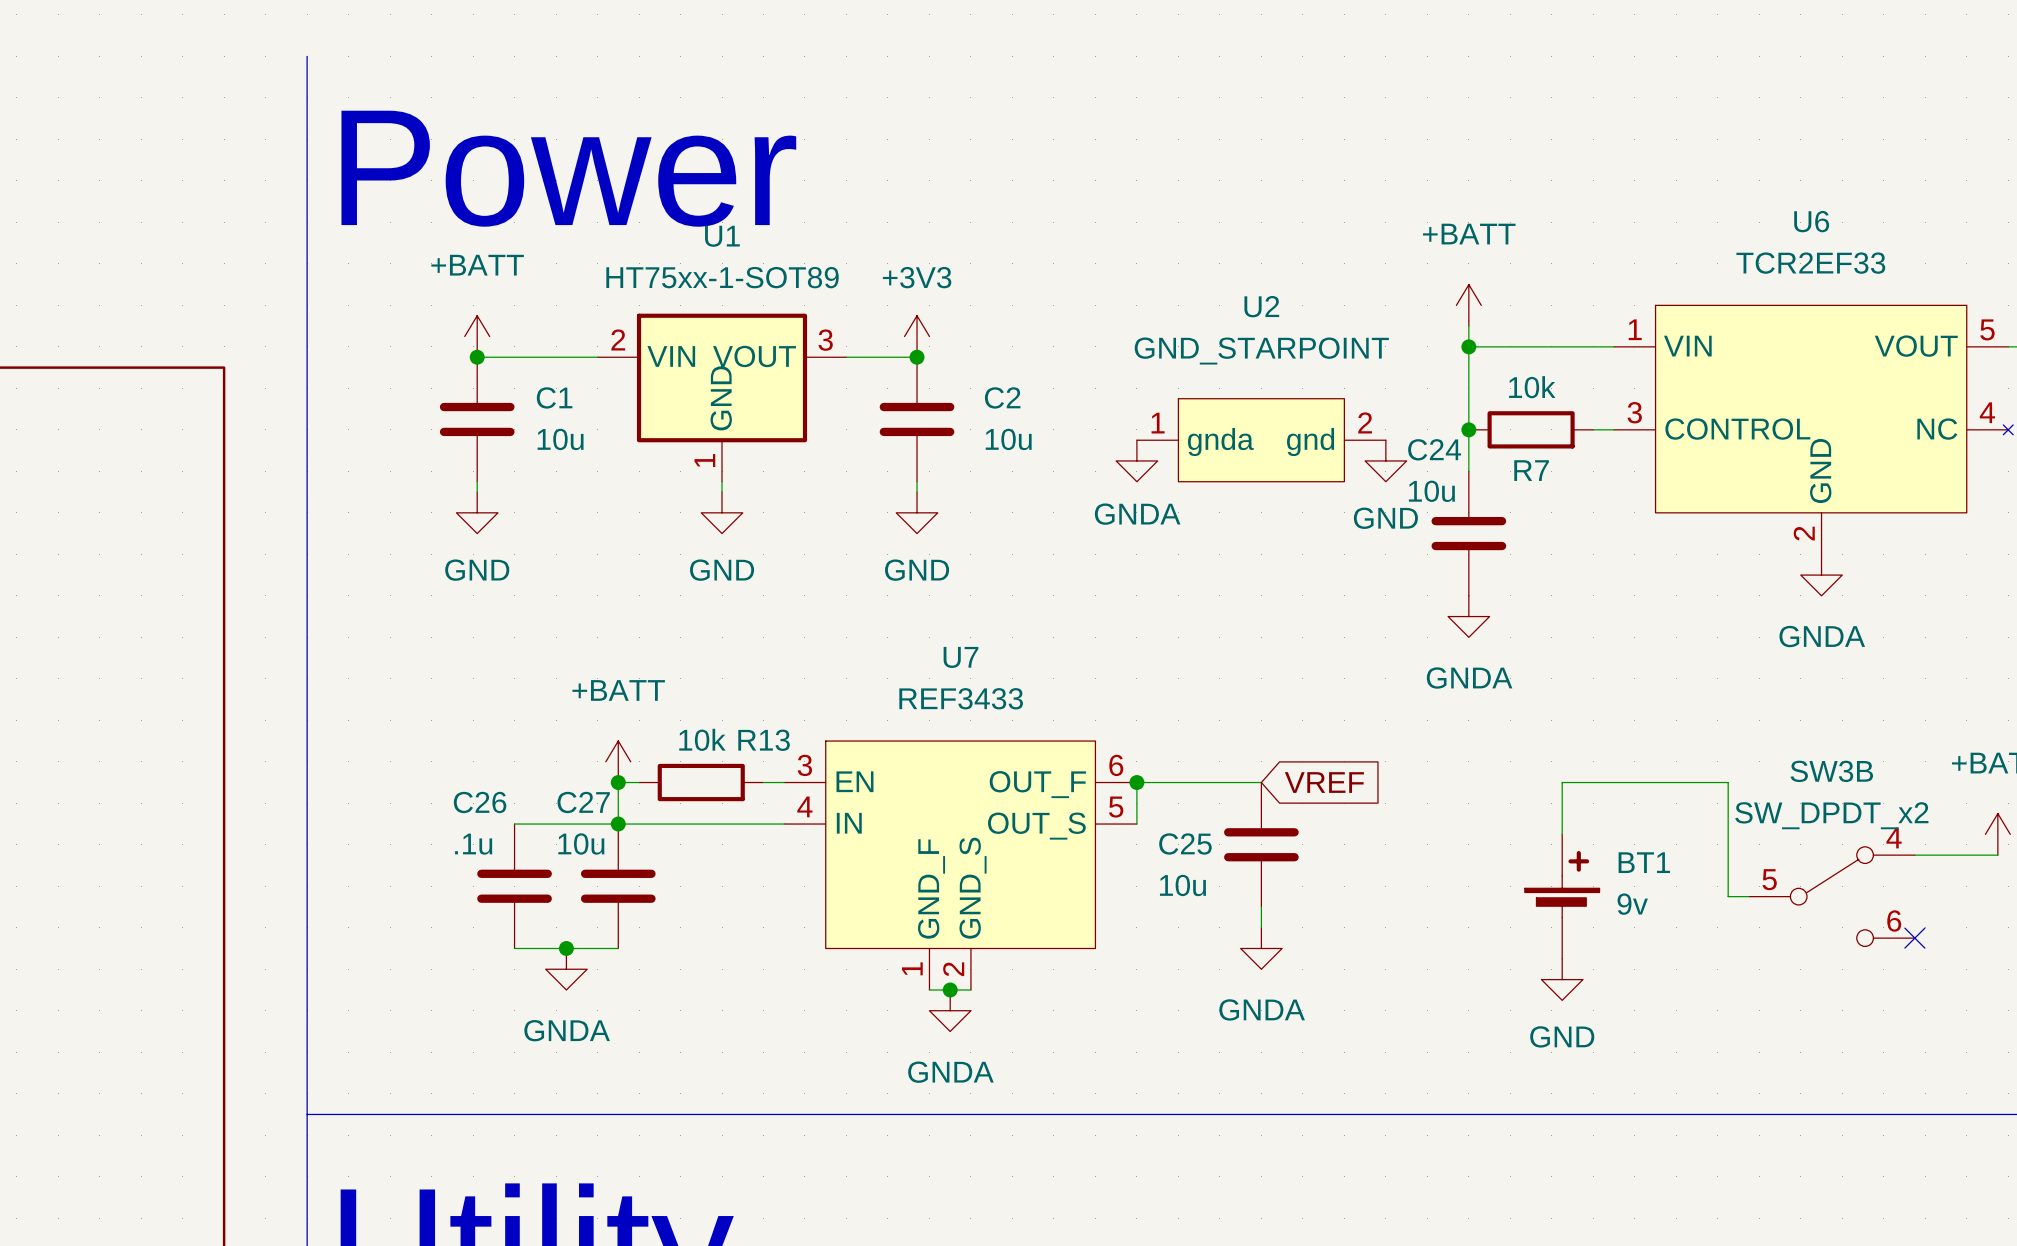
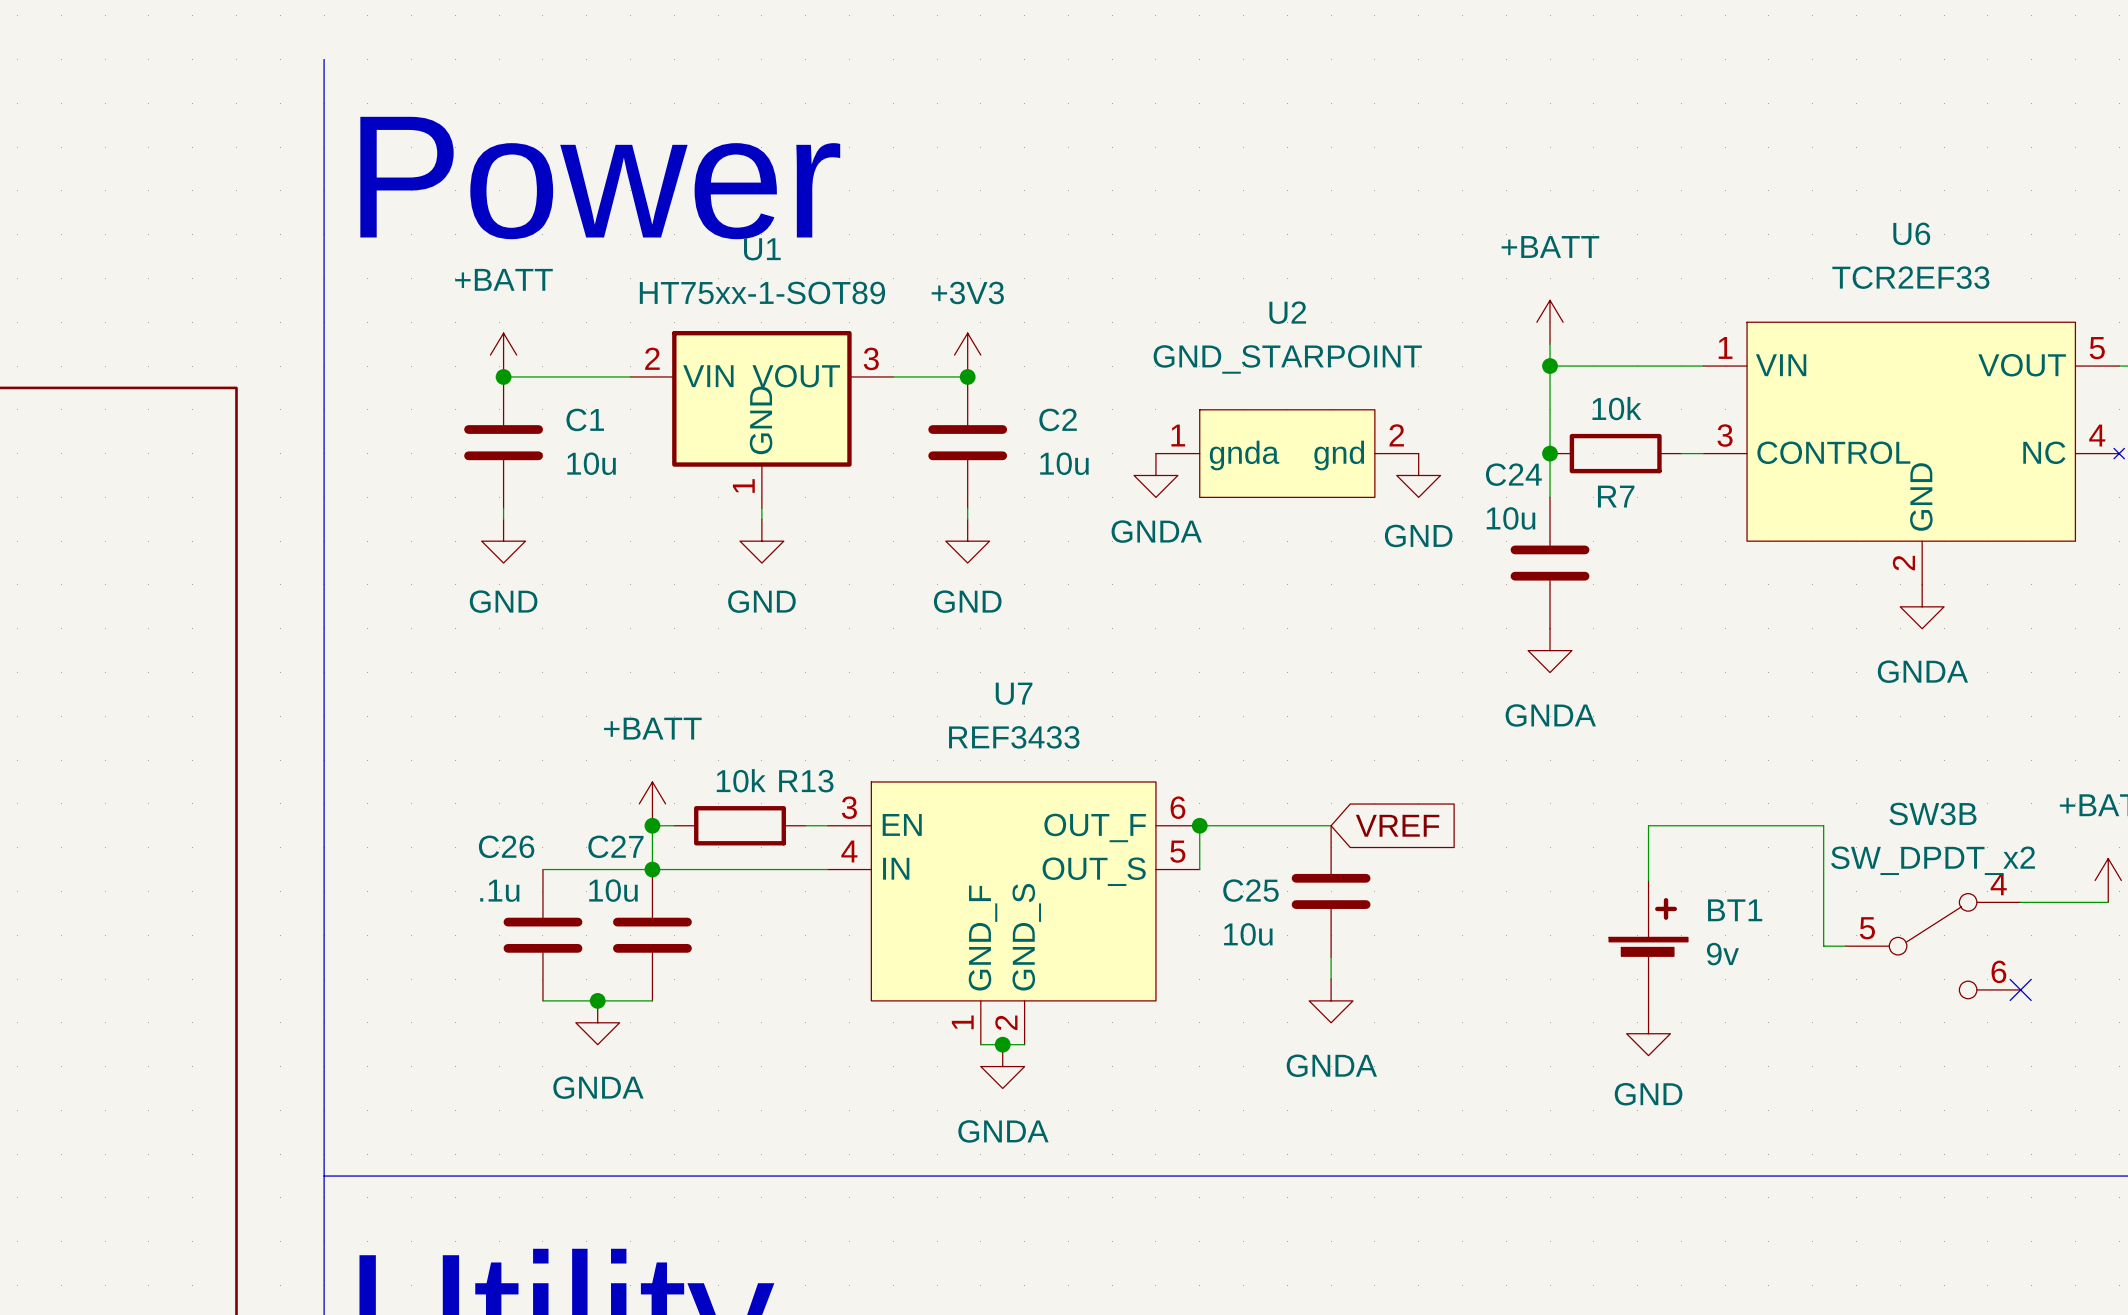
U2 position: (1261, 440) -> (1287, 453)
power symbol position: GNDA (1136, 460) -> GNDA (1155, 475)
power symbol position: GND (1385, 460) -> GND (1418, 475)

